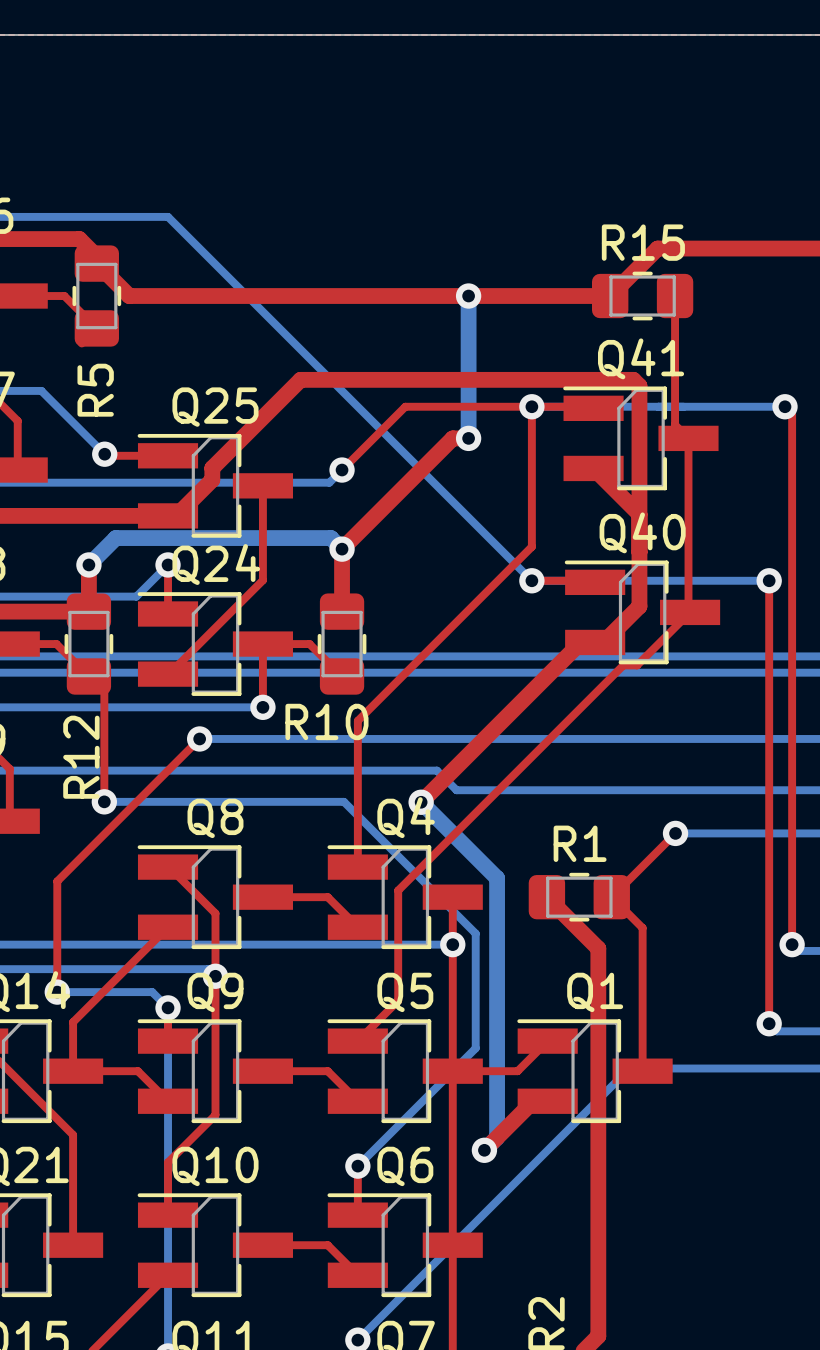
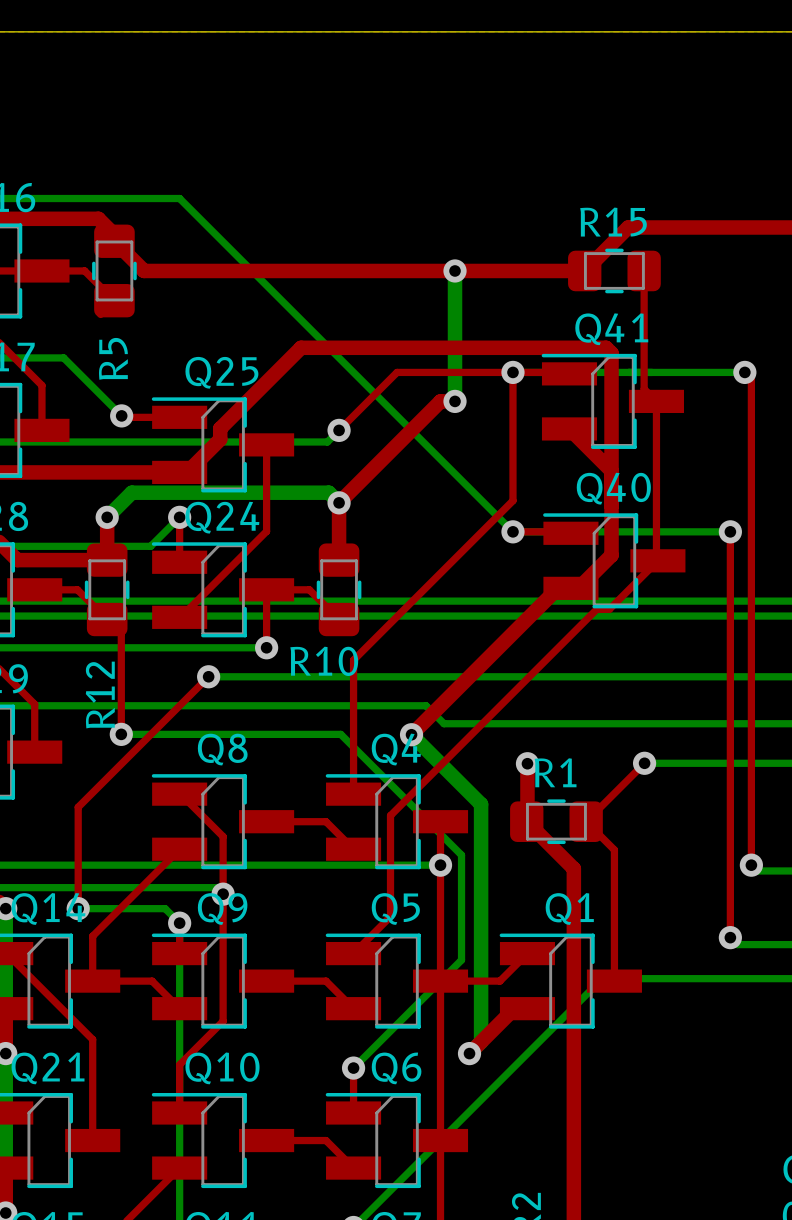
top track: none -> (527, 763) (527, 820)
via: none -> (527, 763)

